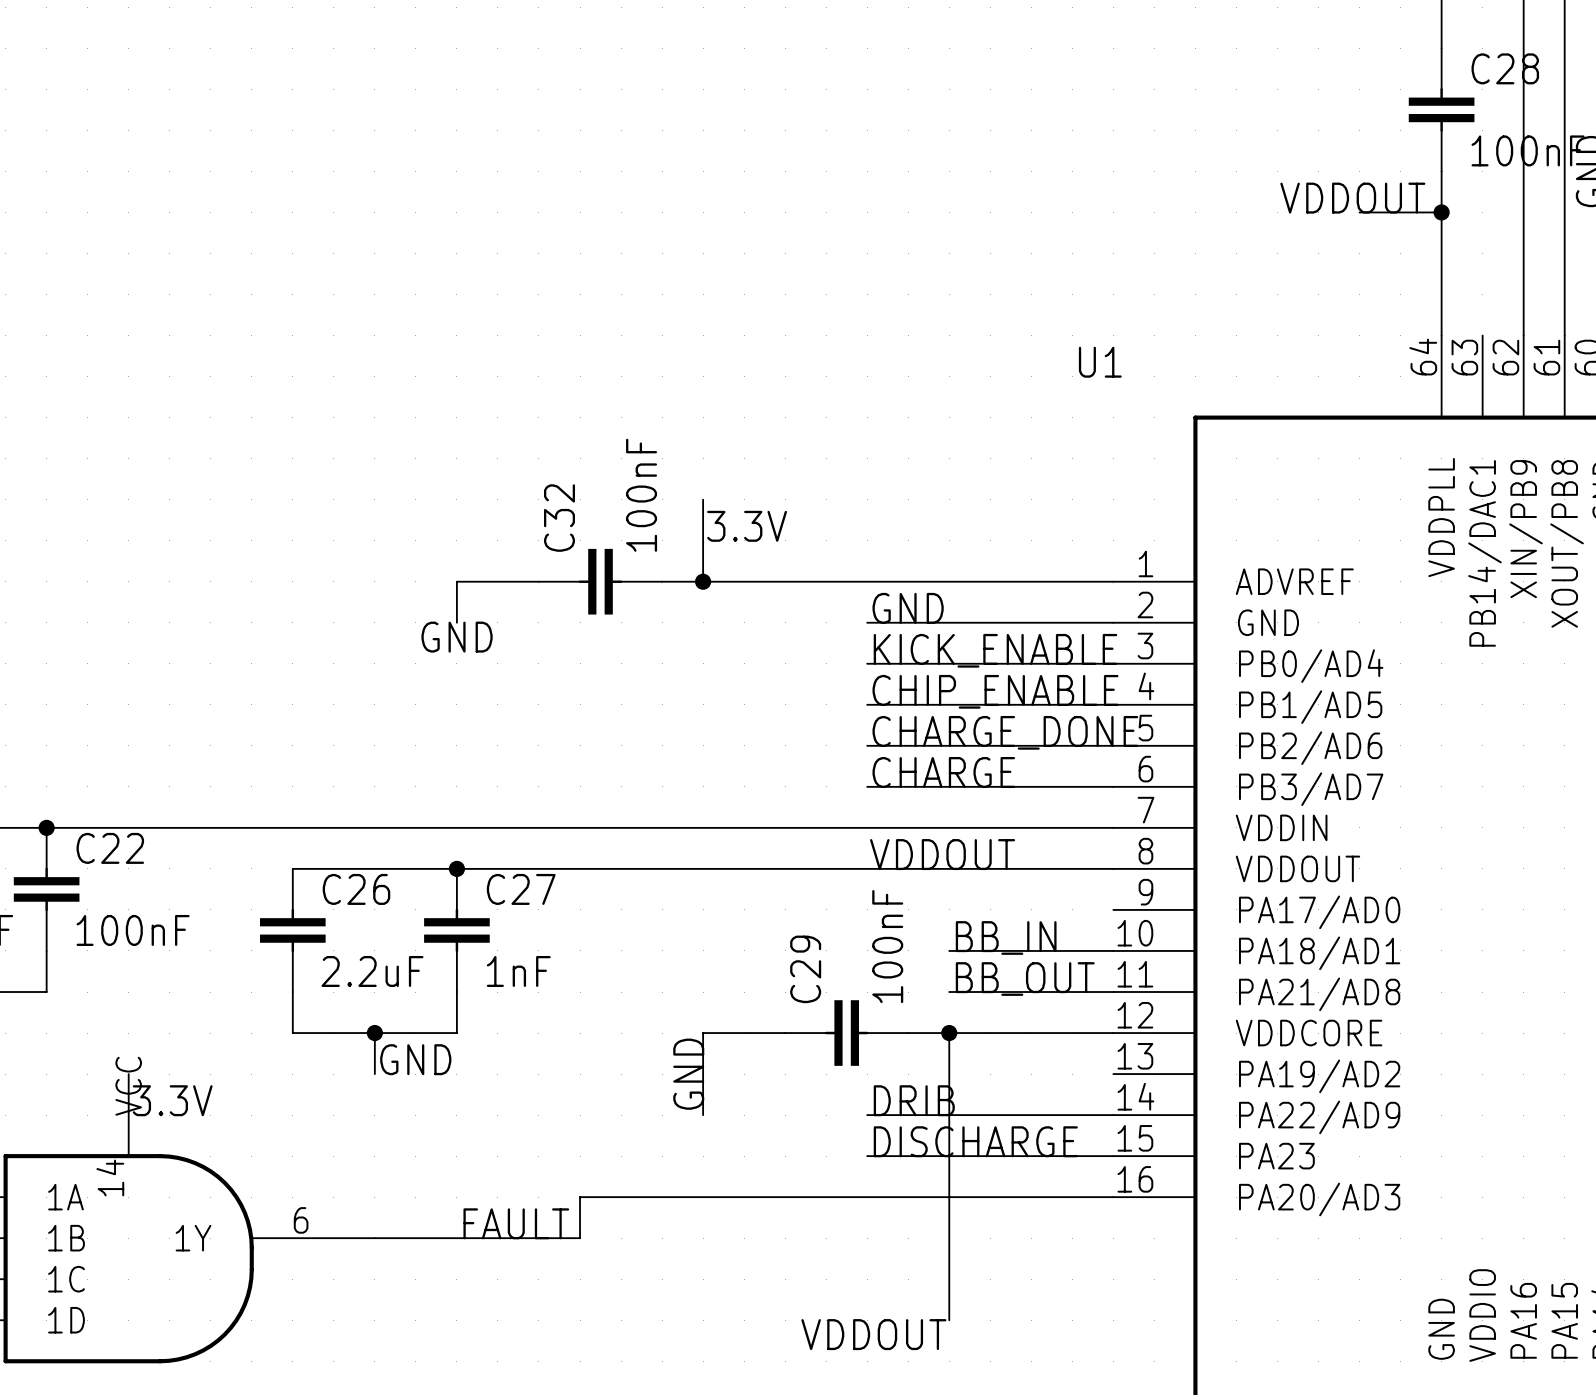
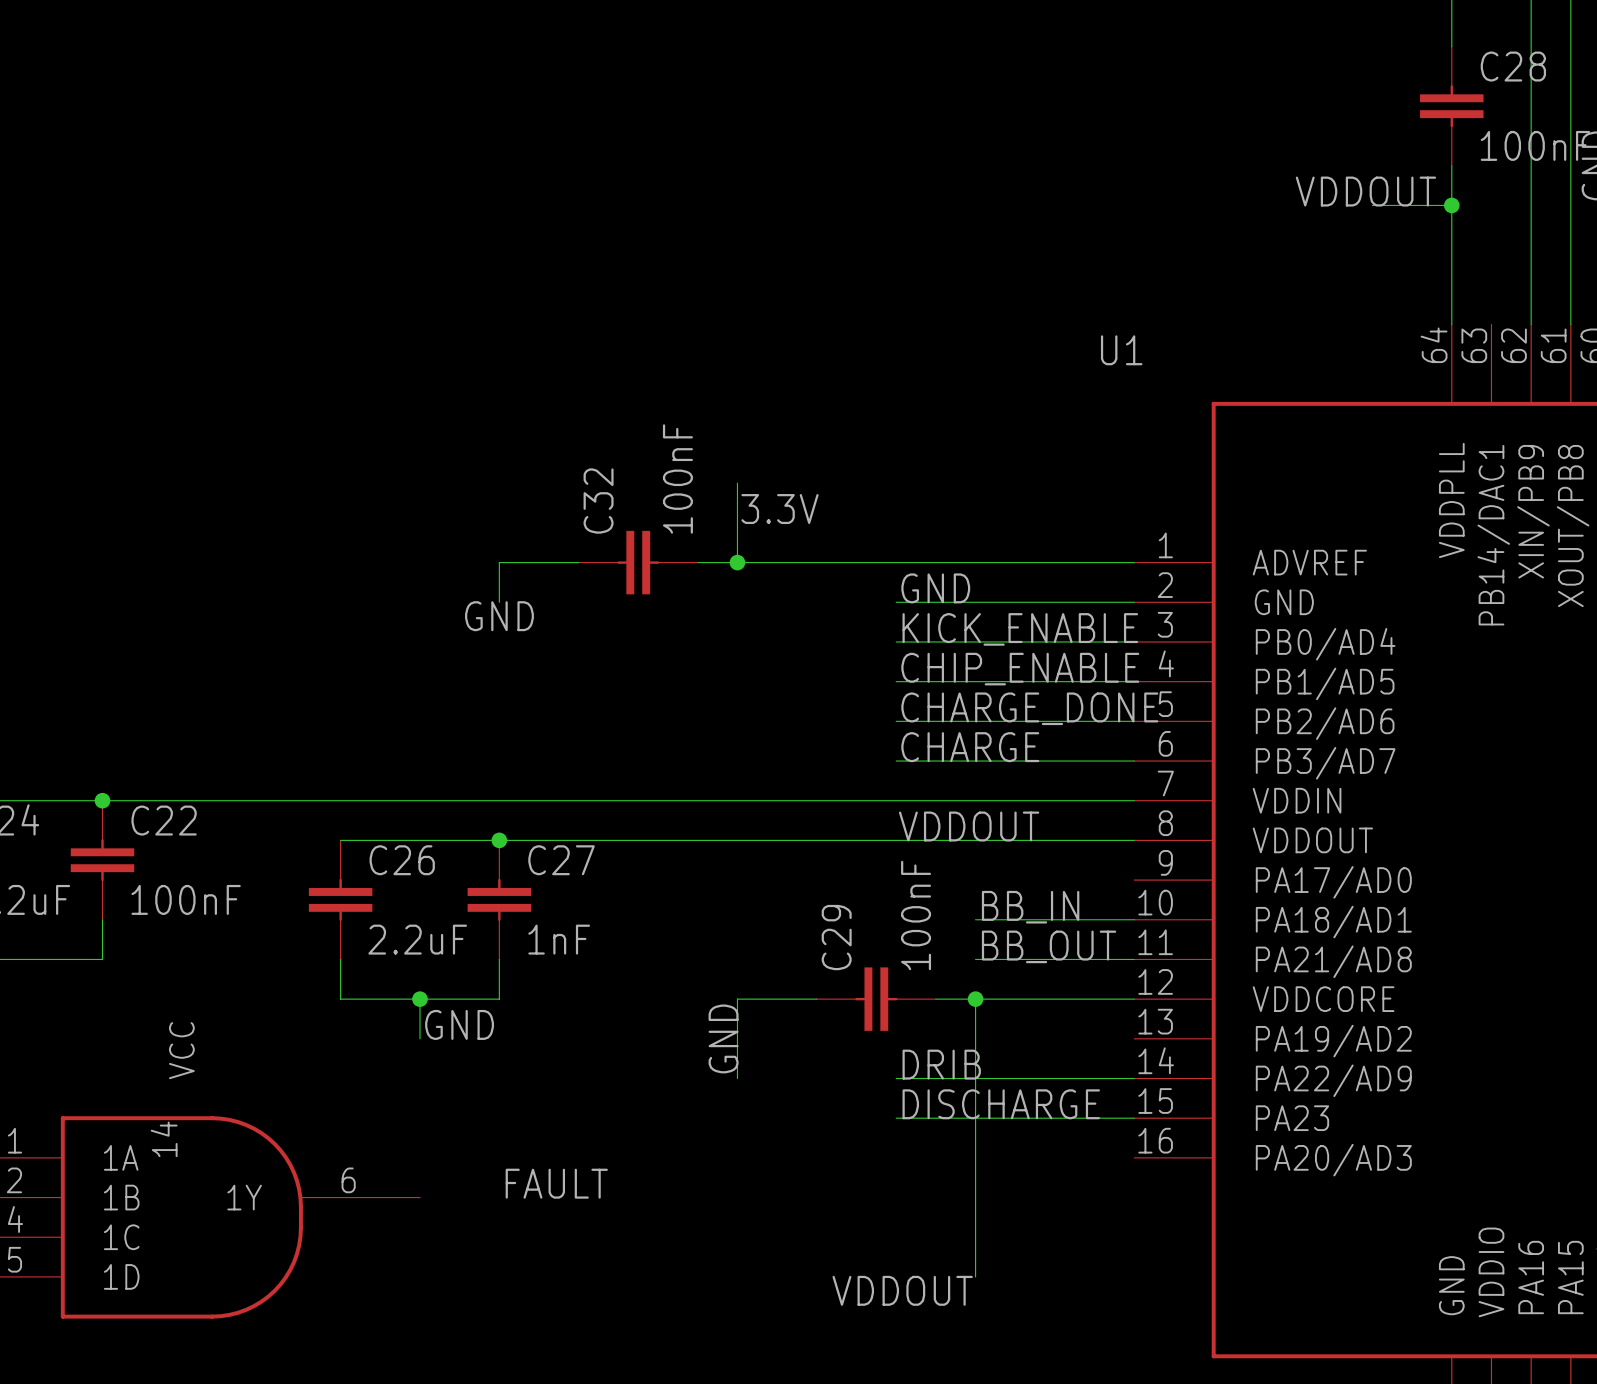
wire: (128, 1074) (128, 1156) -> none
label: 3.3V (172, 1100) -> none
wire: (1113, 1197) (580, 1197) (580, 1238) (374, 1238) -> none

